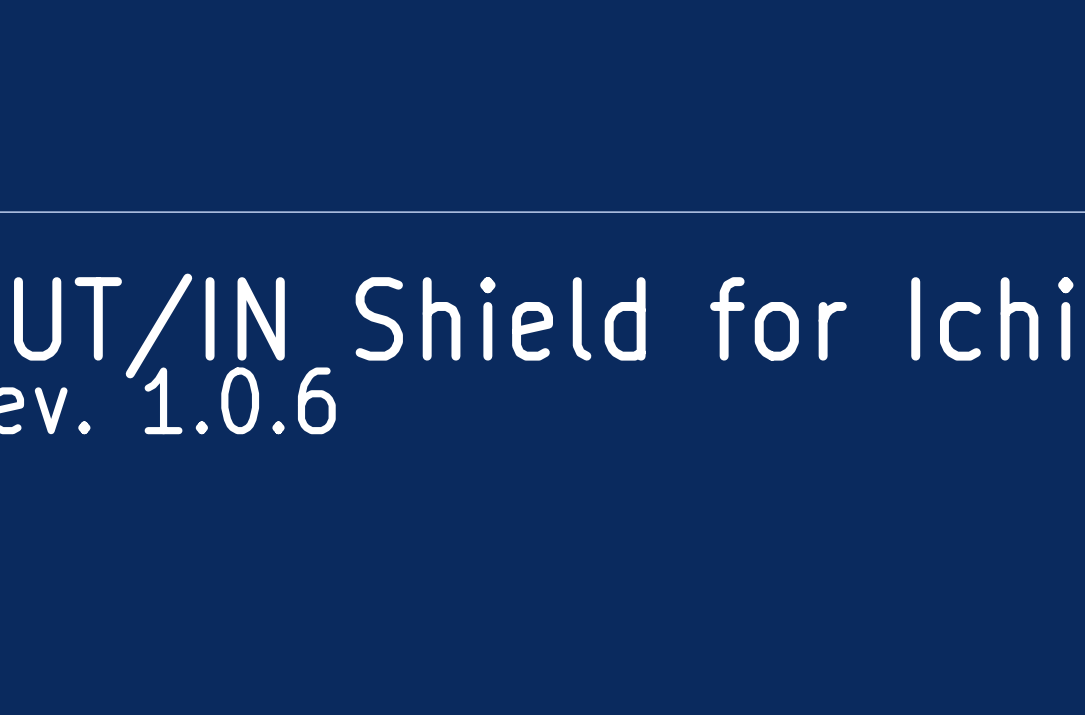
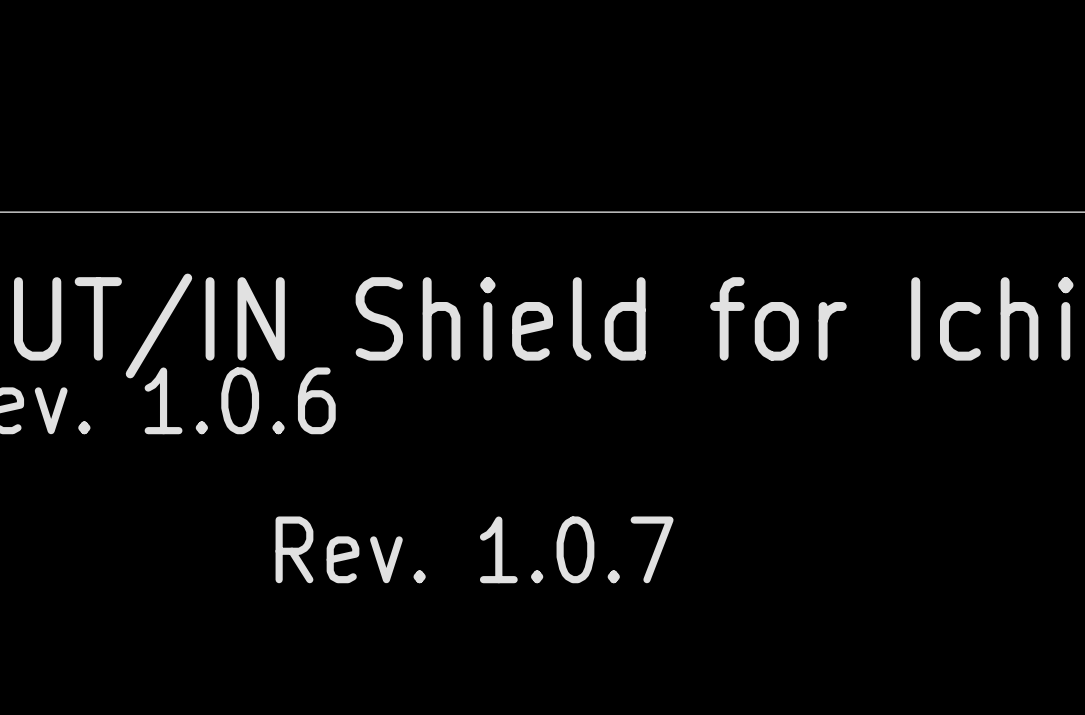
text: none -> Rev. 1.0.7 (474, 549)

